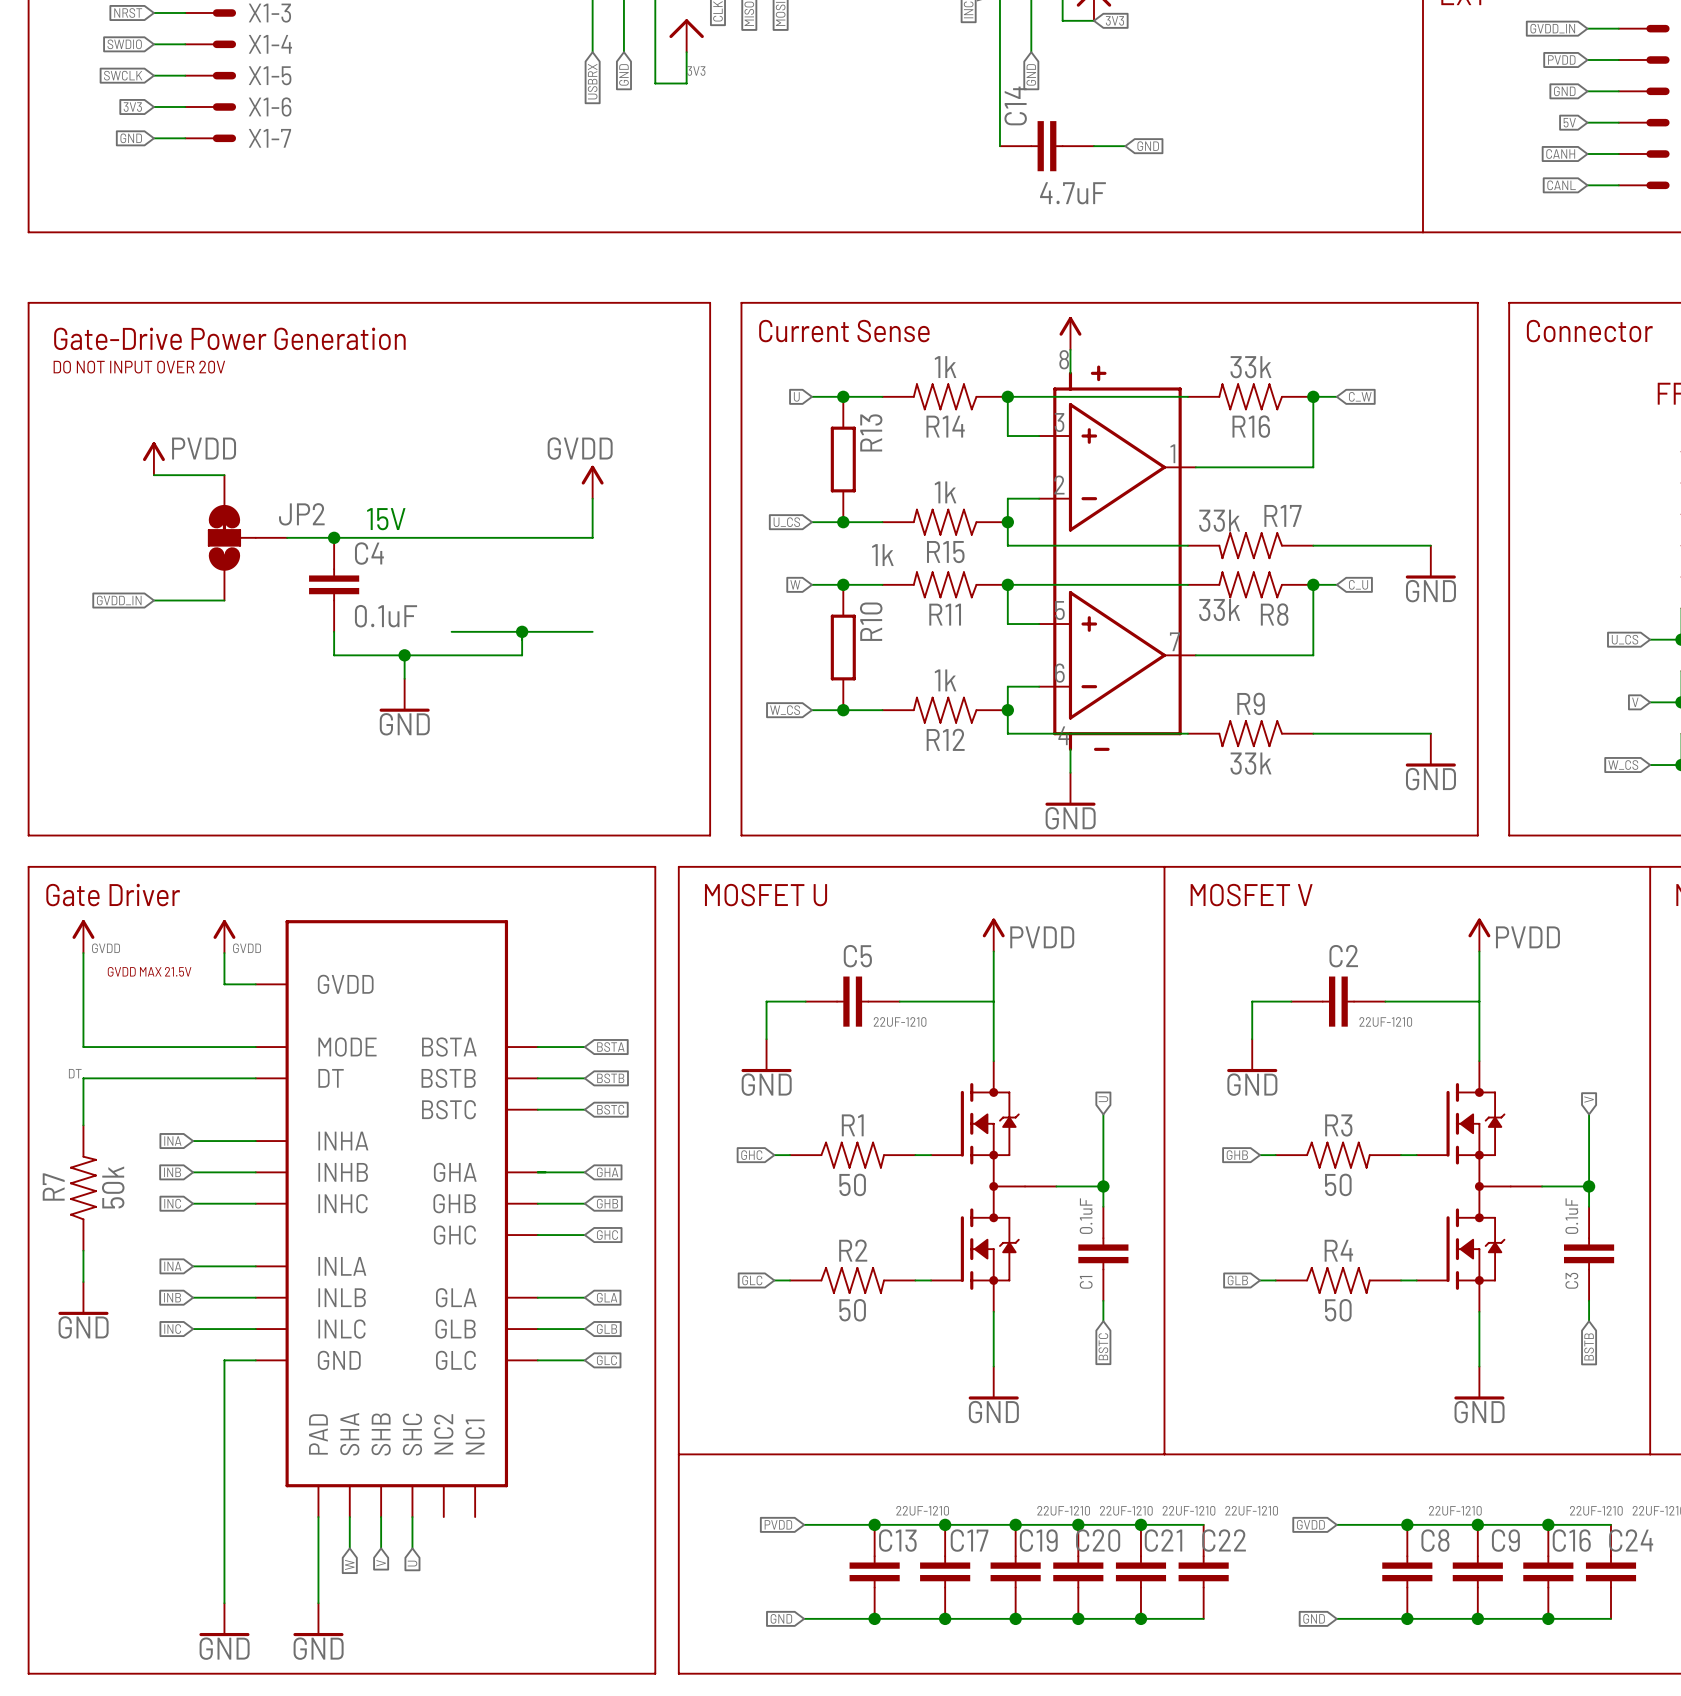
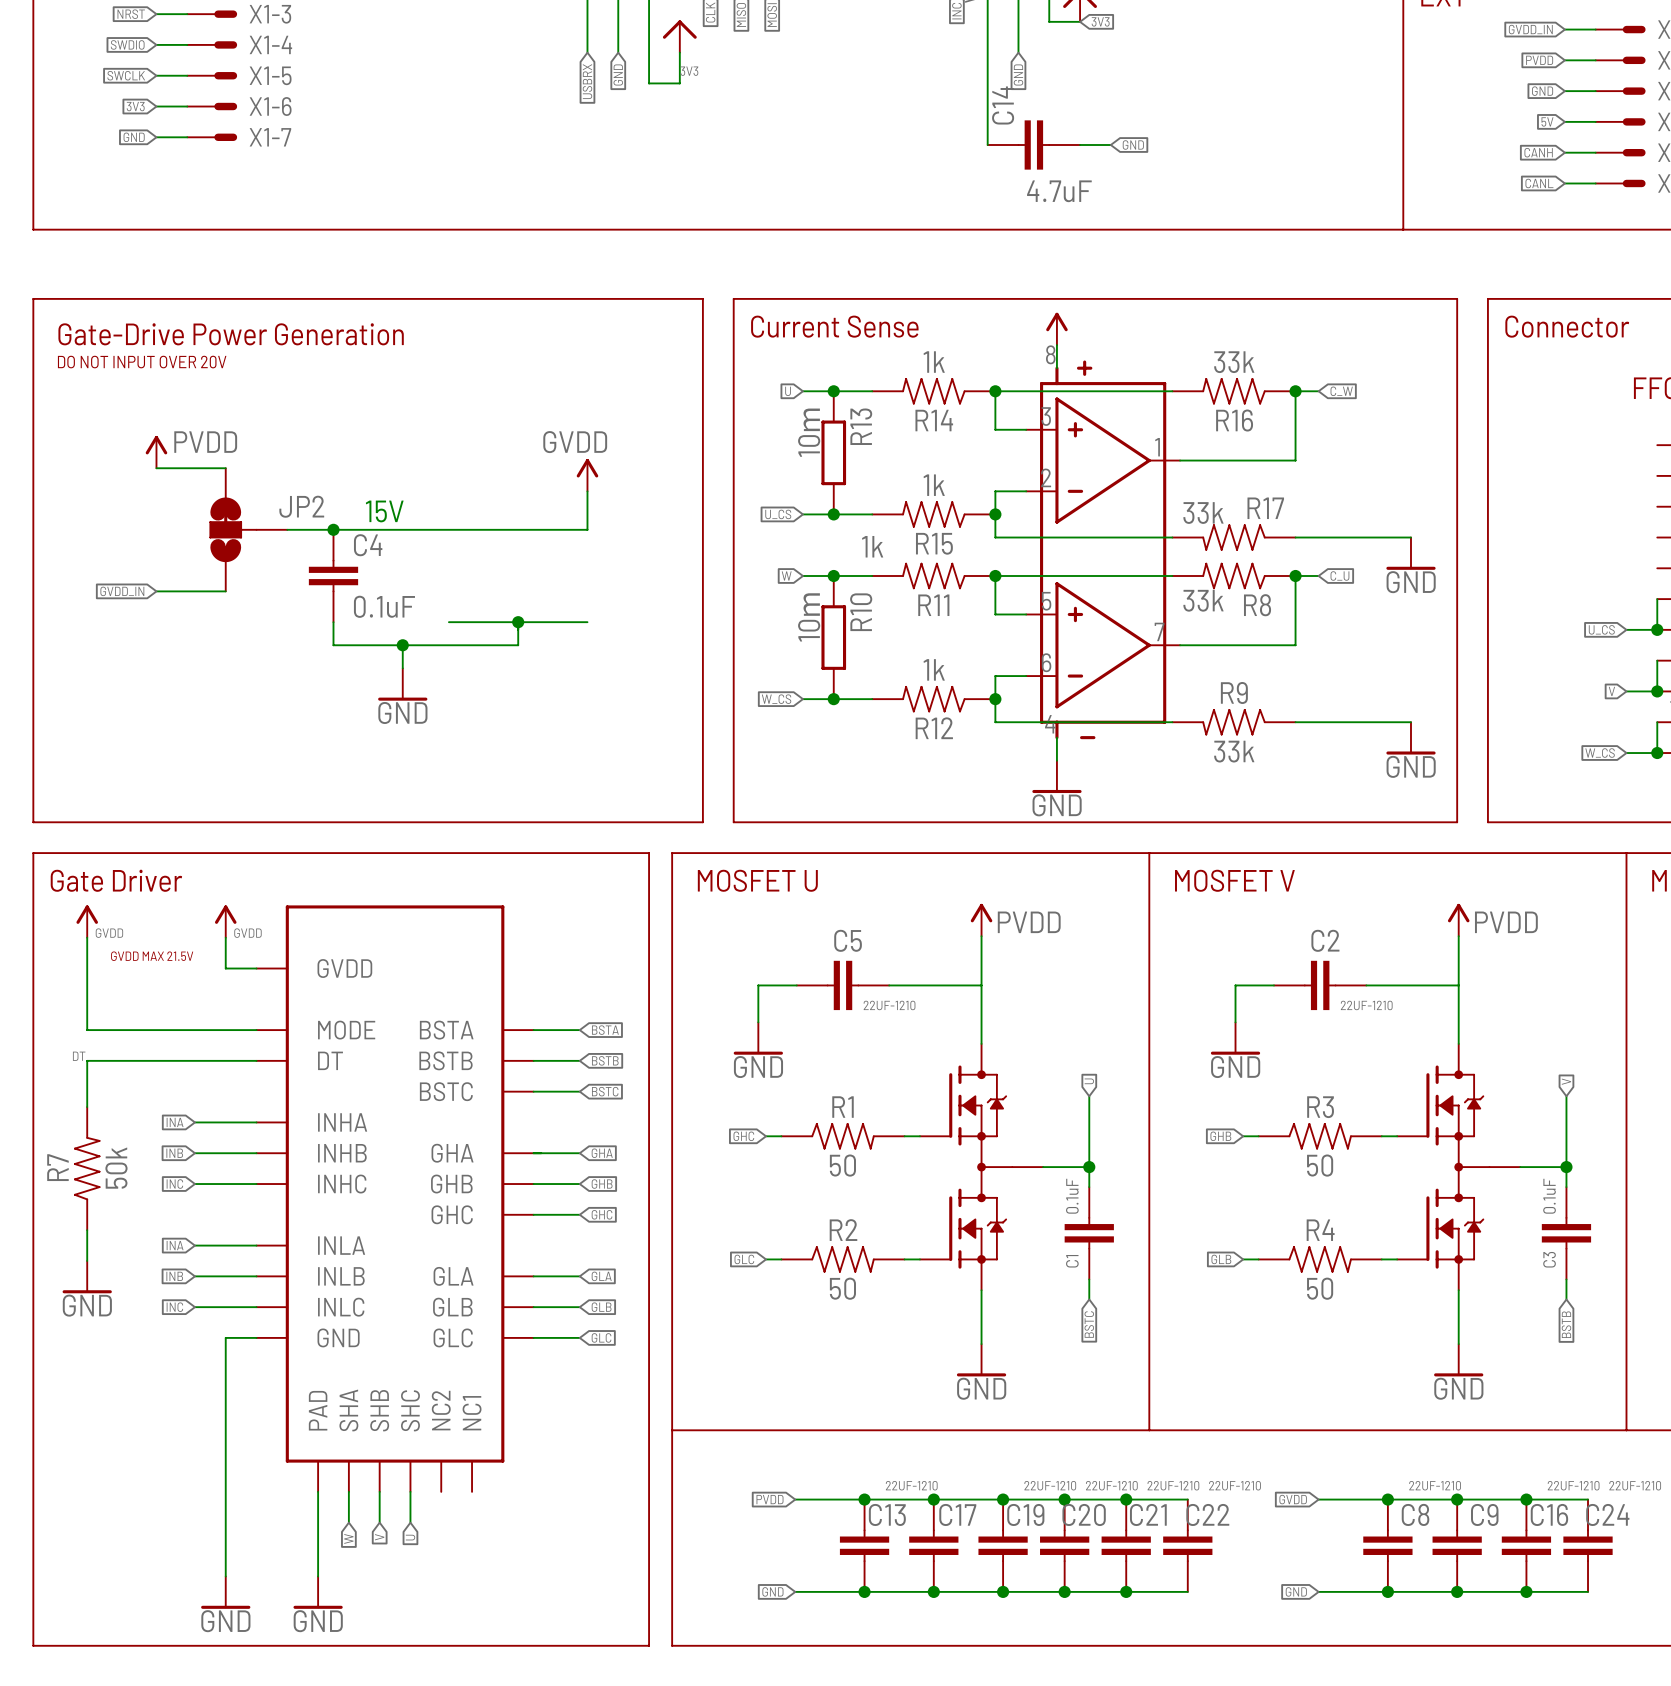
R13 value: none -> 10ｍ (809, 432)
R10 value: none -> 10ｍ (809, 617)

